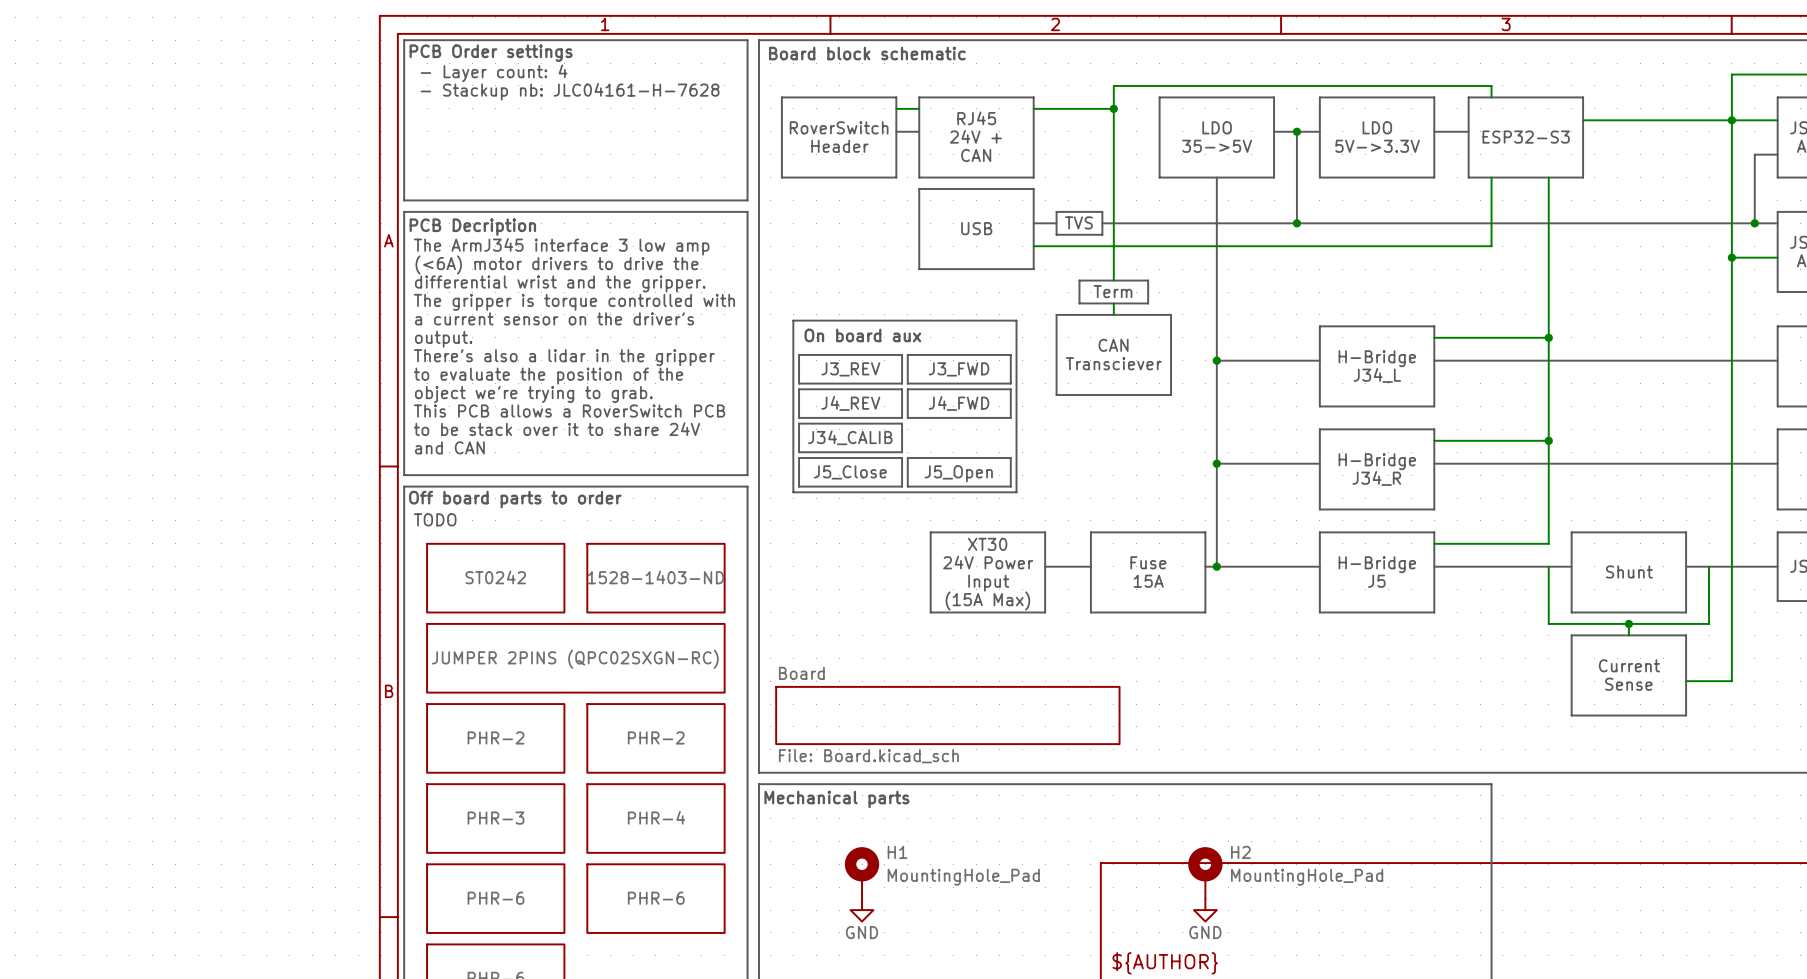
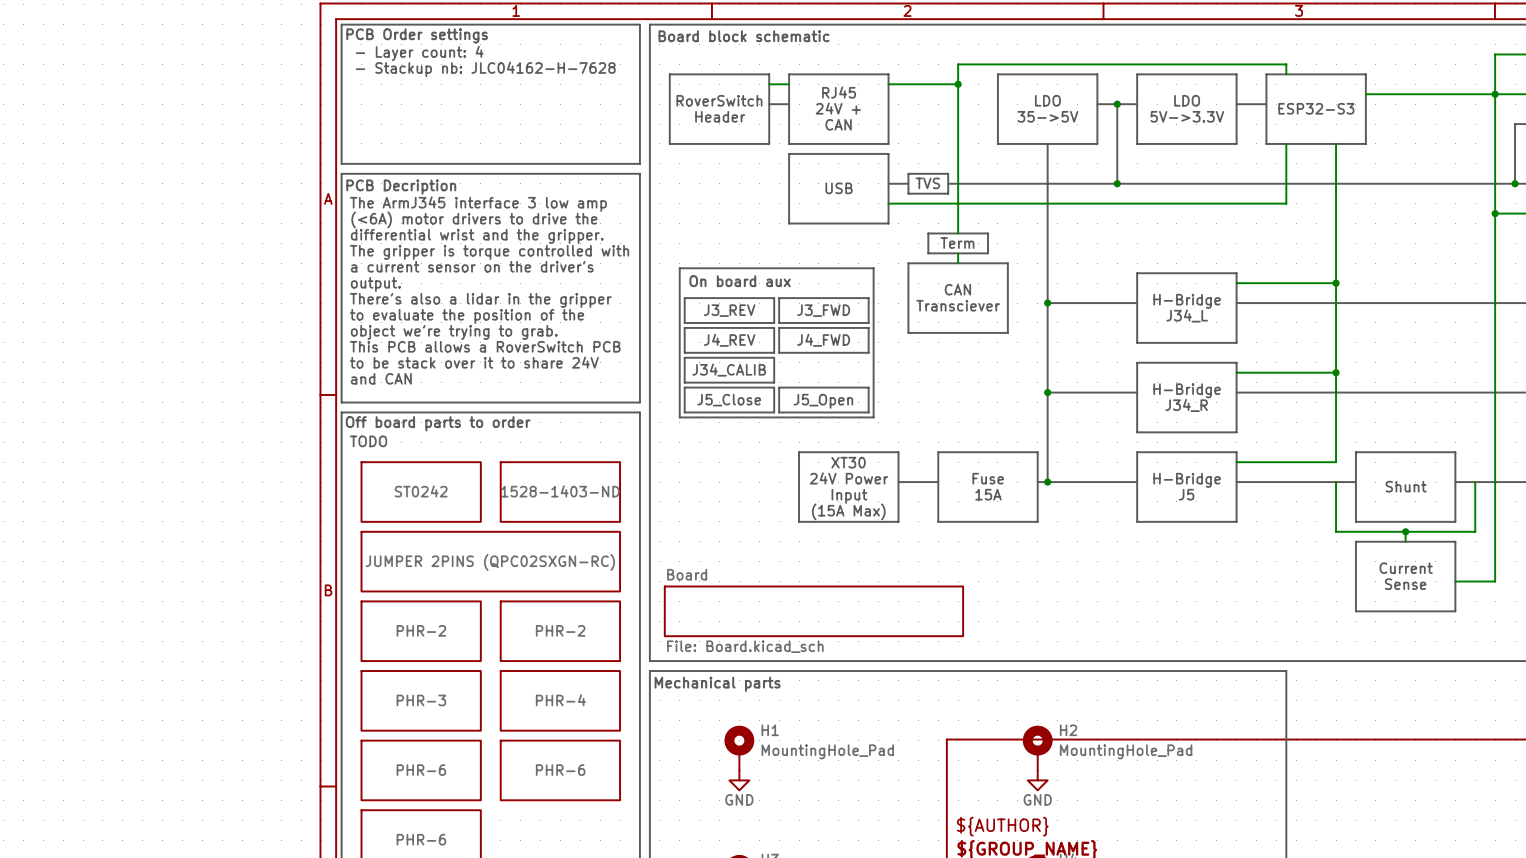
text: - Stackup nb: JLC04161-H-7628 (570, 91) -> - Stackup nb: JLC04162-H-7628 (485, 69)

